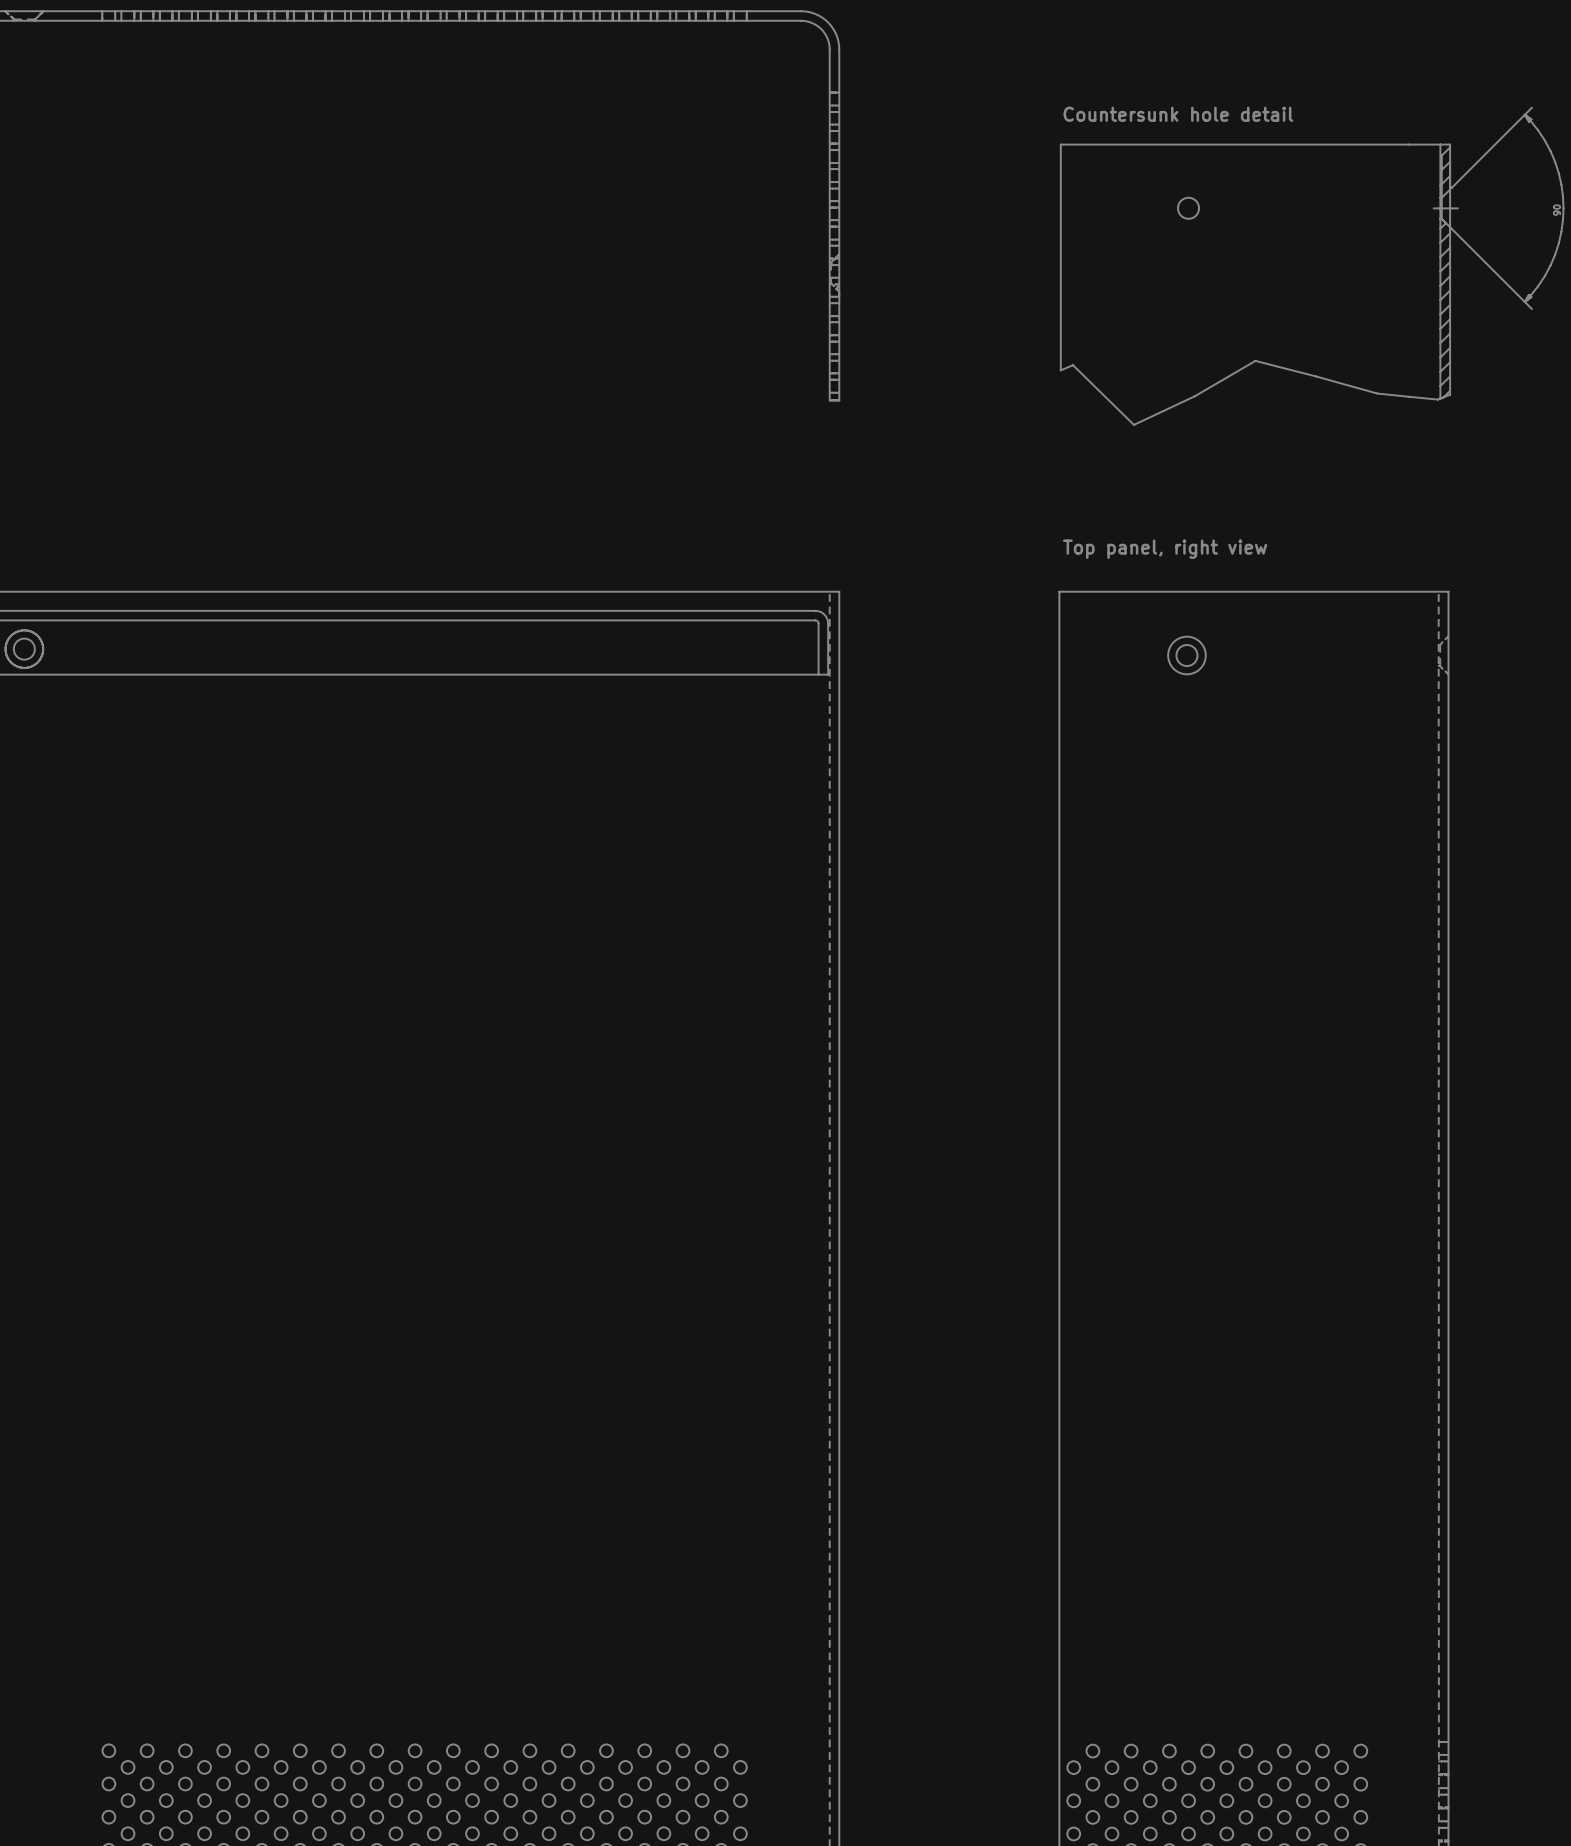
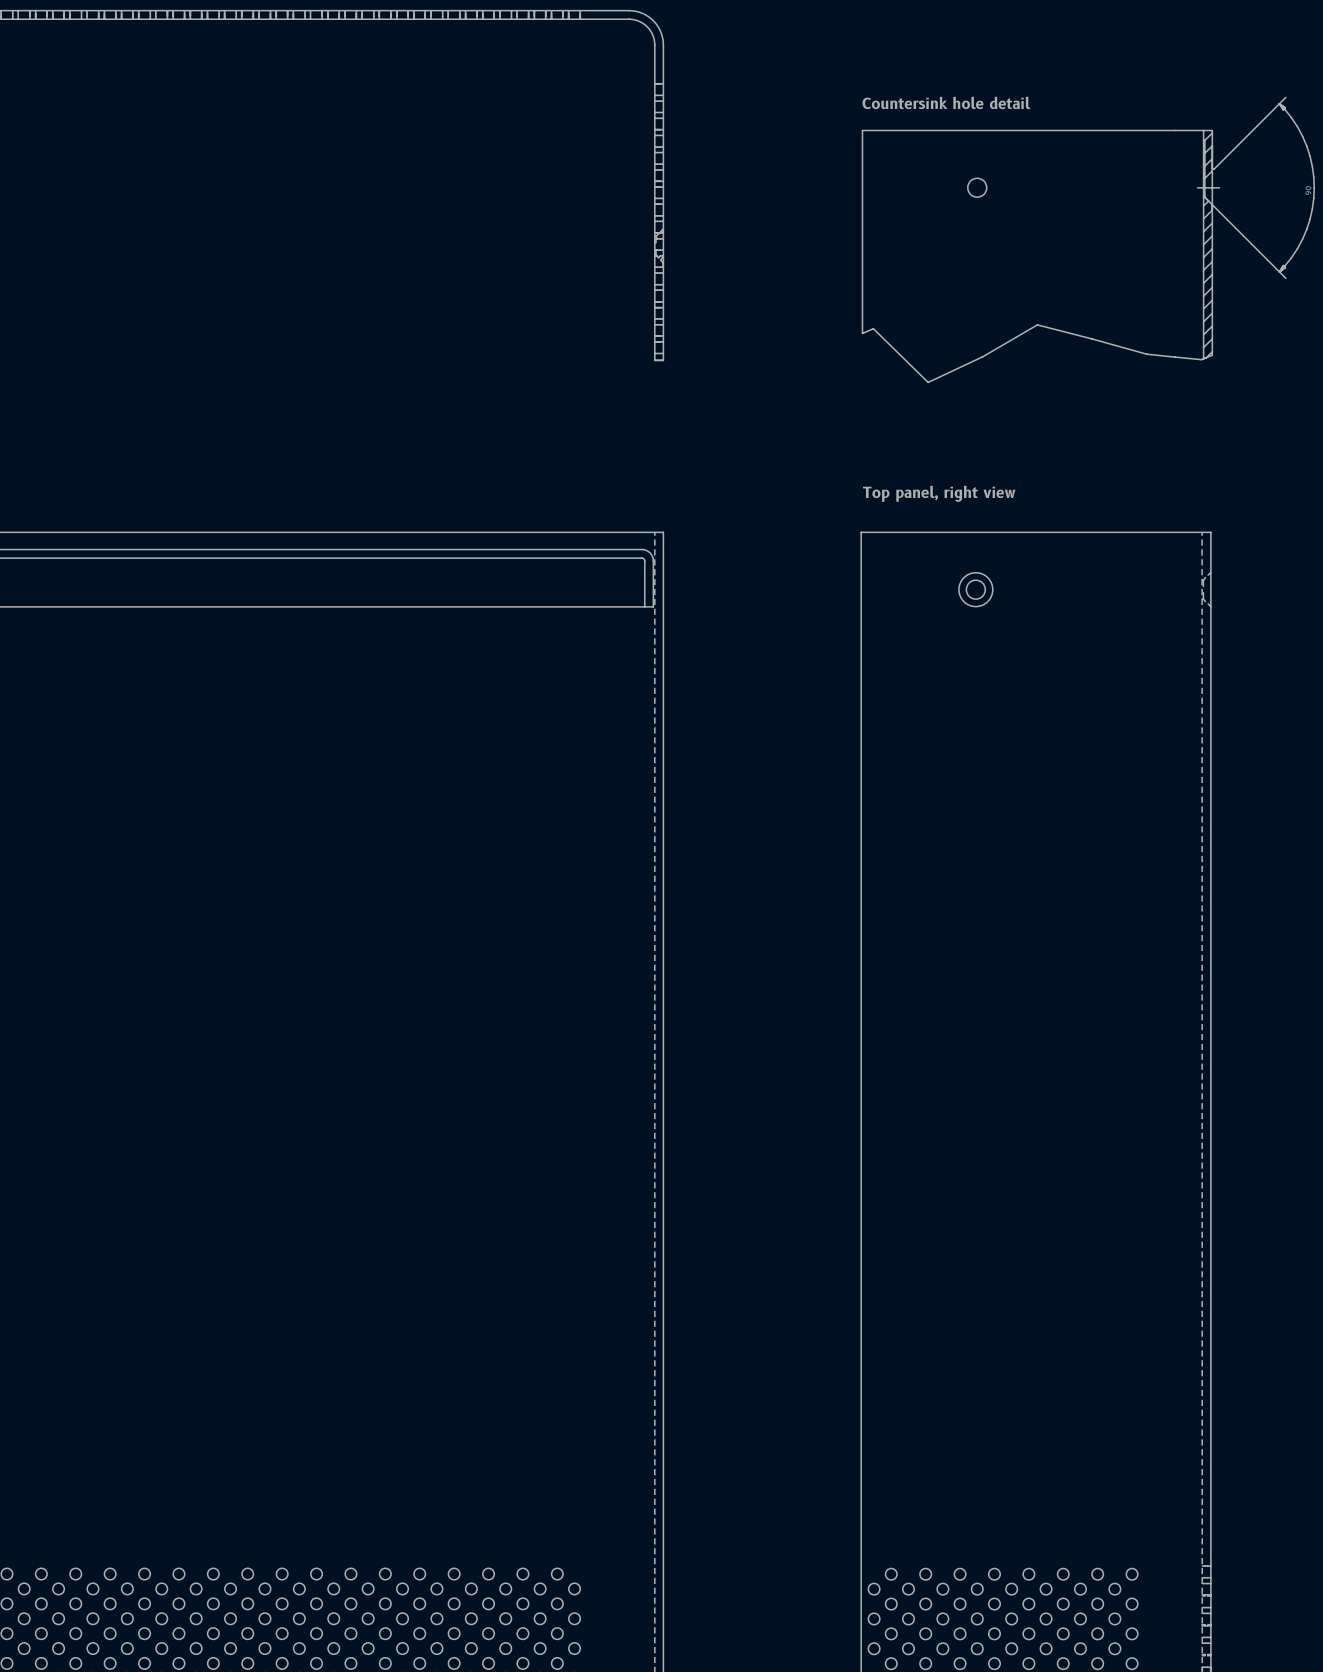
text: Countersunk hole detail (1178, 114) -> Countersink hole detail (946, 102)

